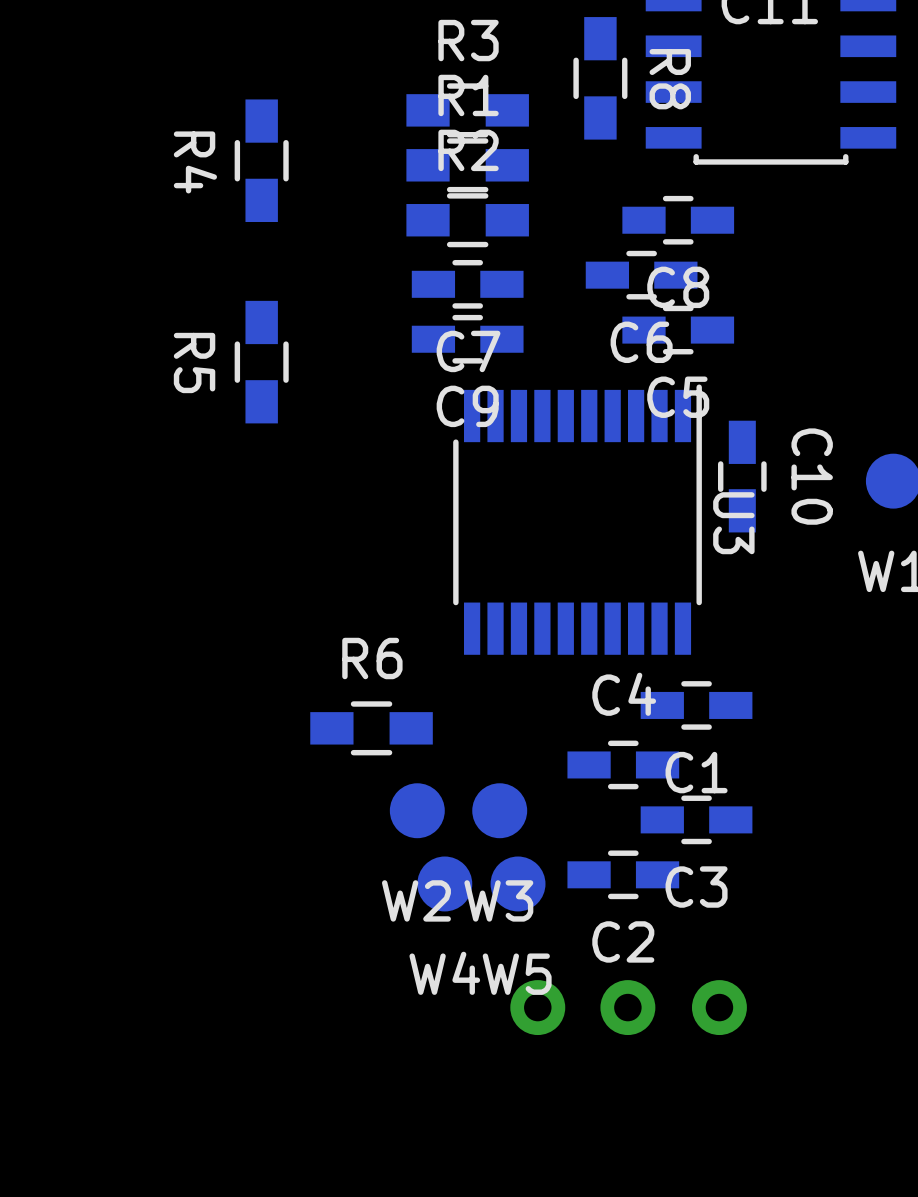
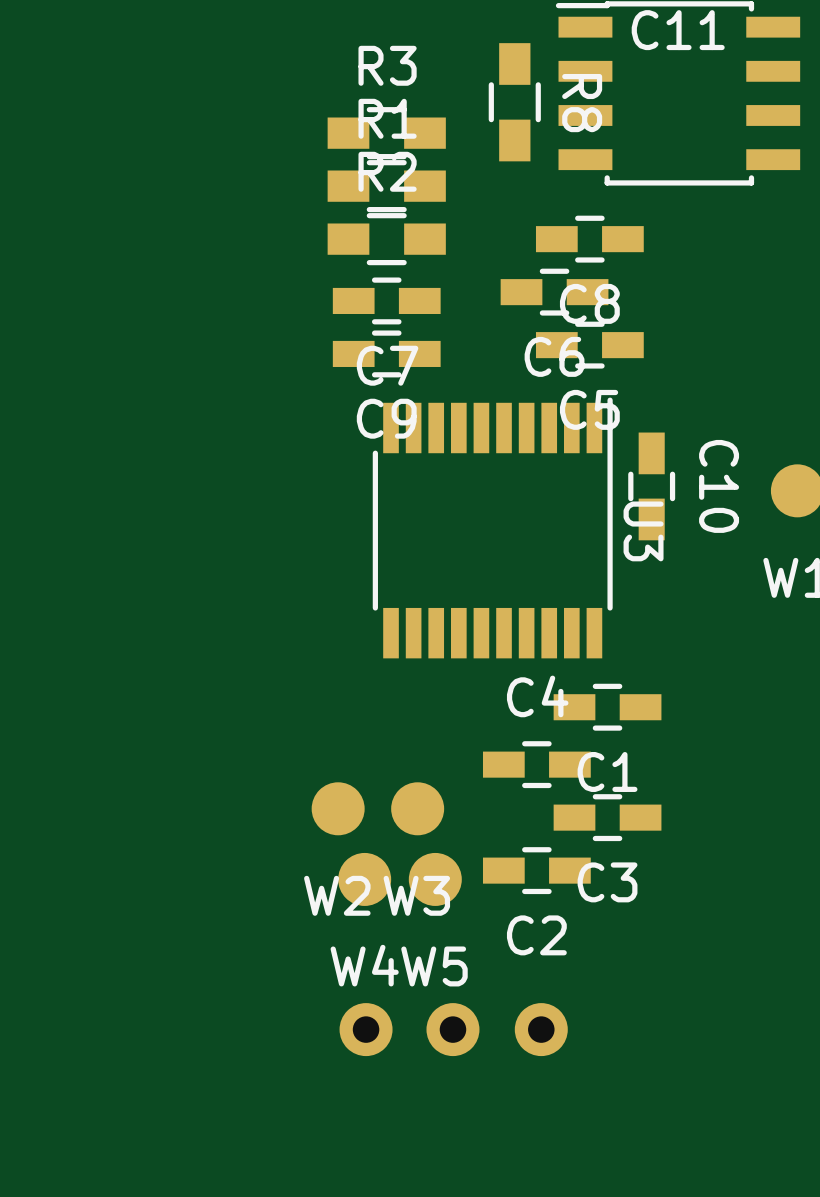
R4: (261, 160) -> none
R5: (261, 362) -> none
R6: (371, 728) -> none
part position: (628, 1007) -> (453, 1029)

